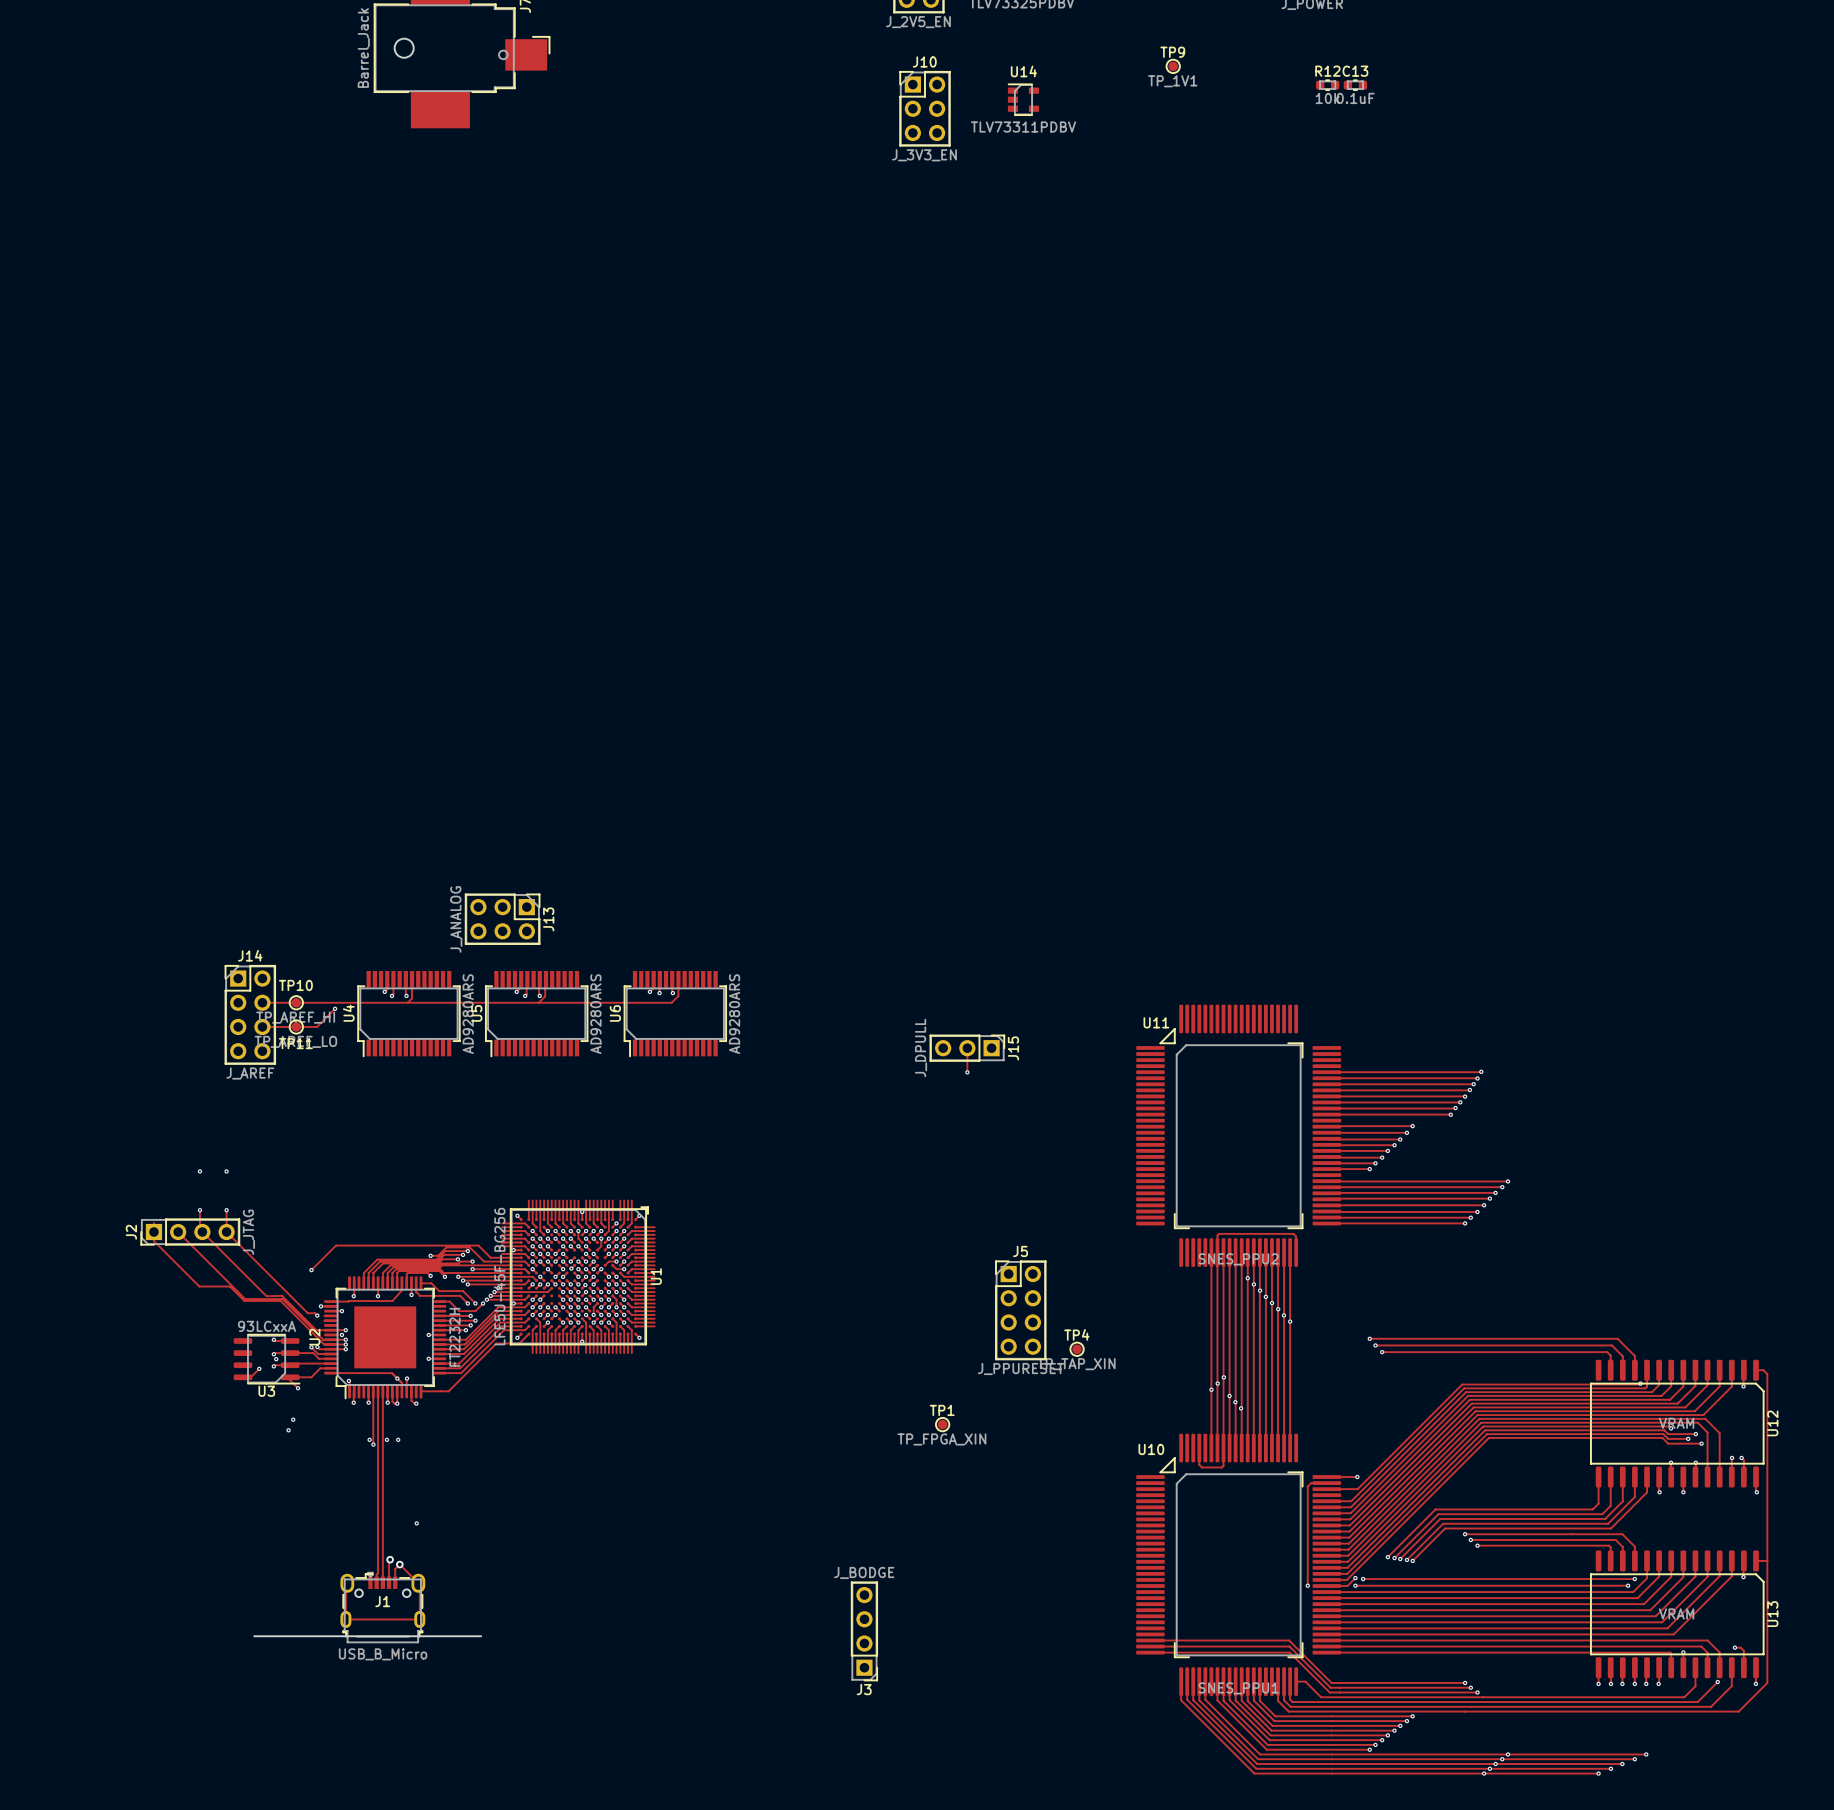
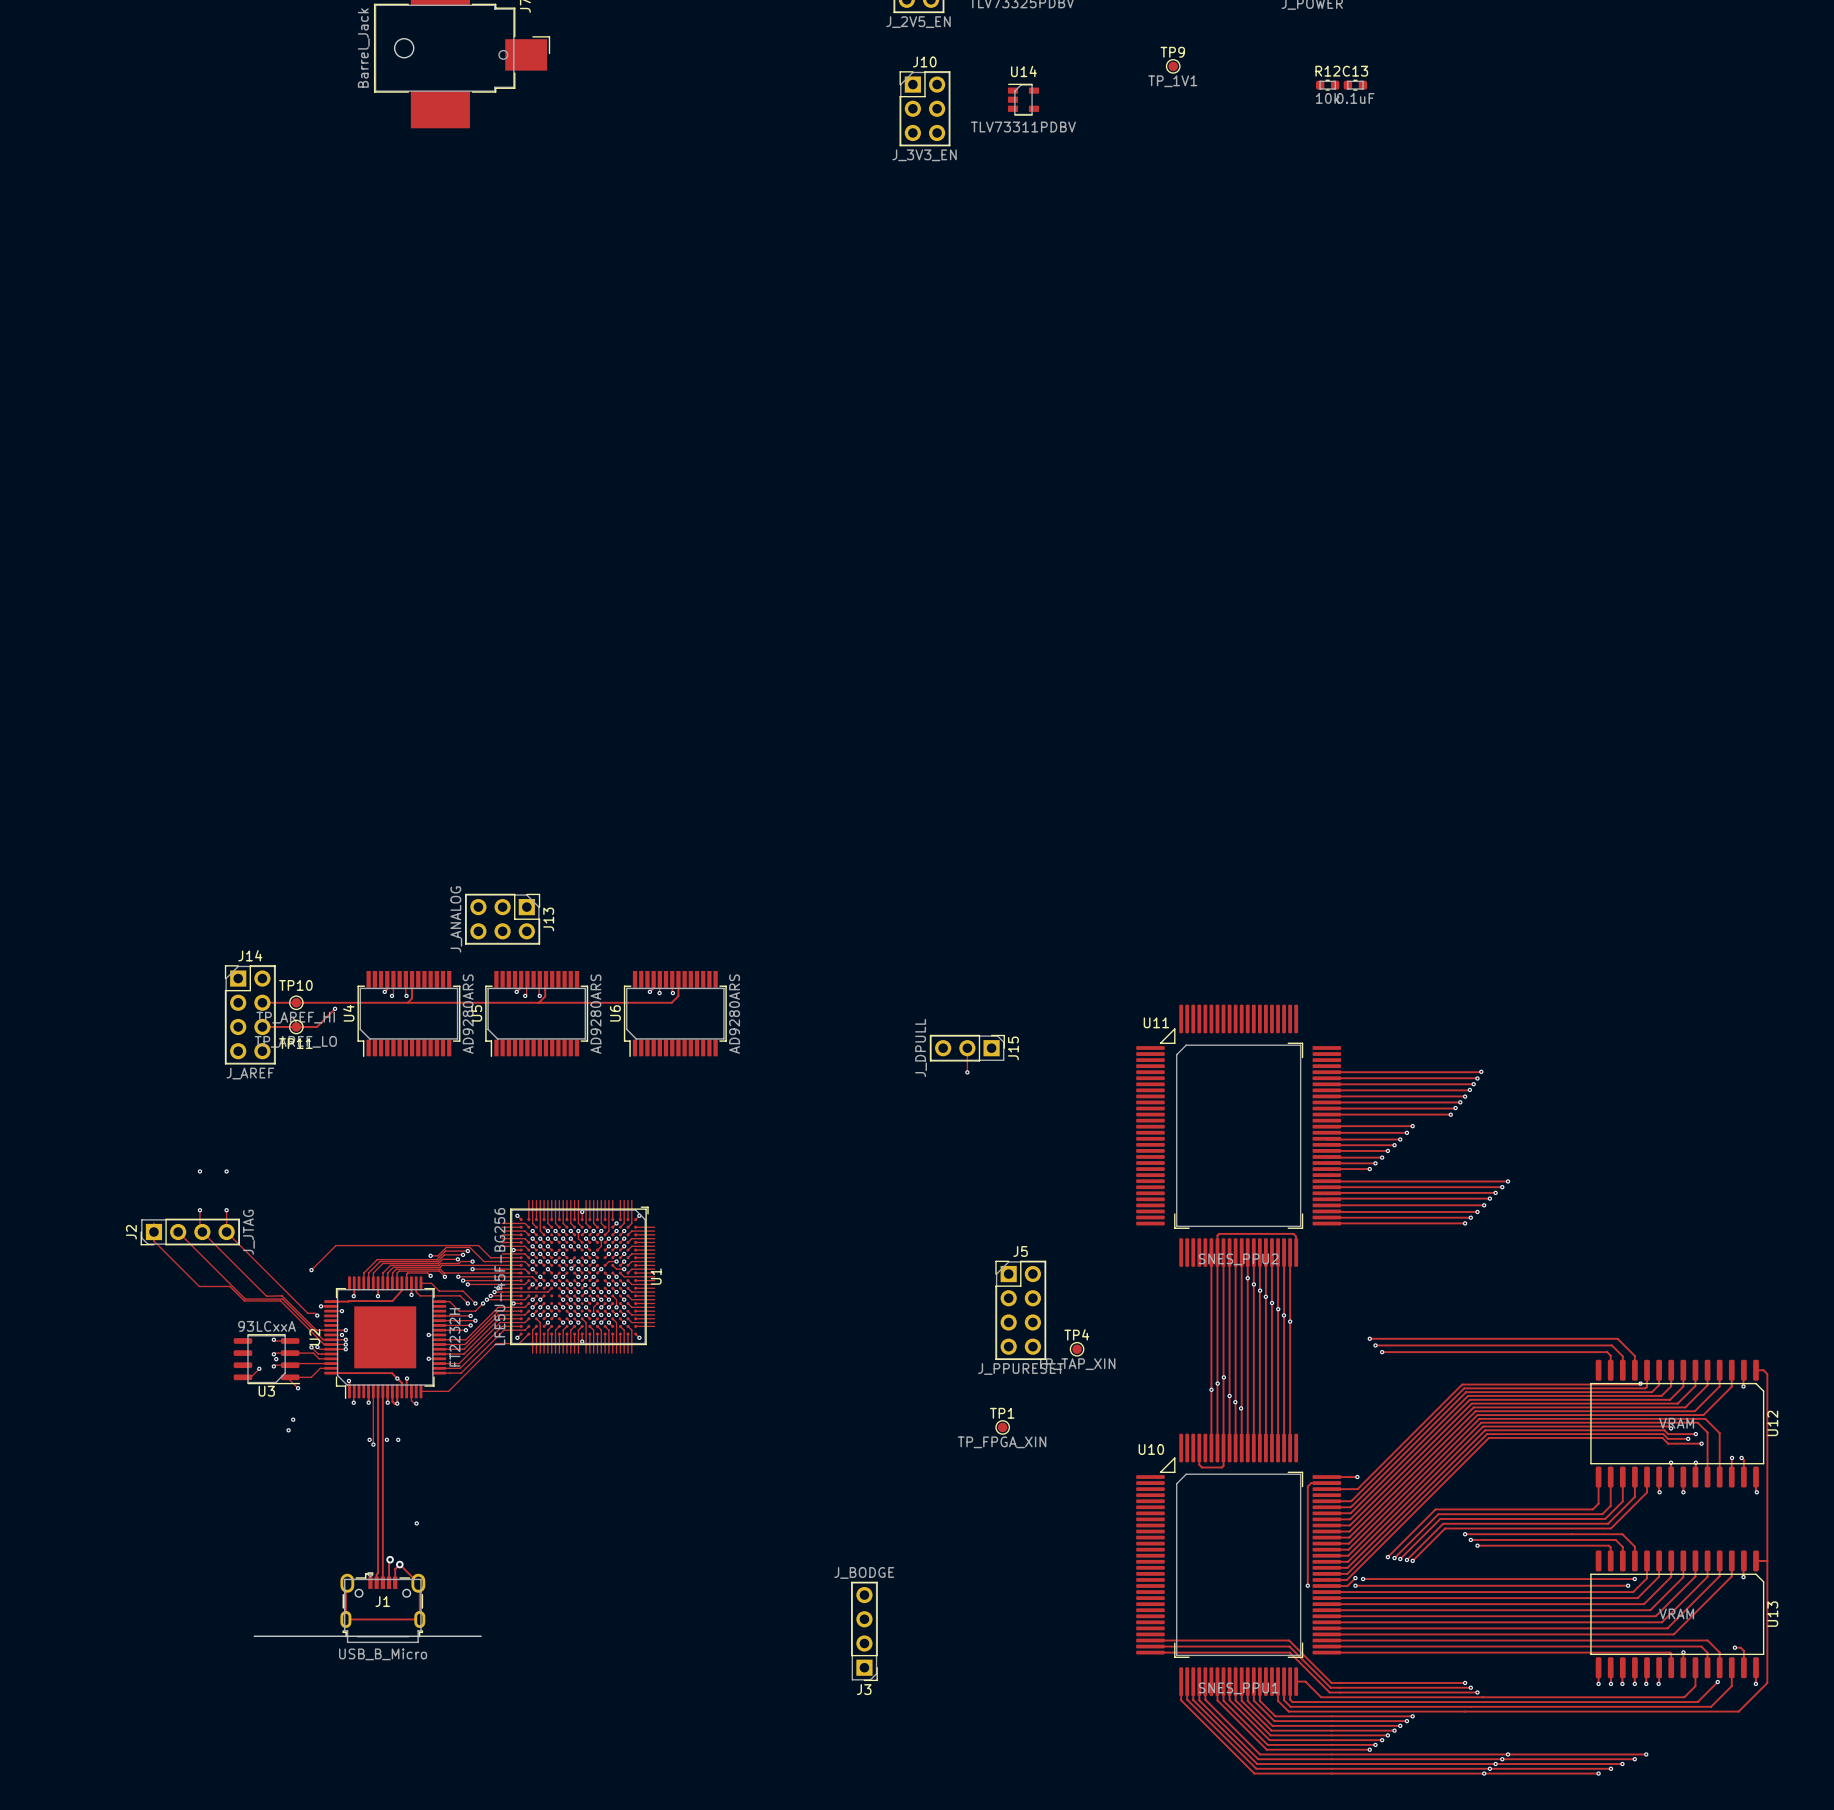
TP1 position: (942, 1424) -> (1002, 1427)

